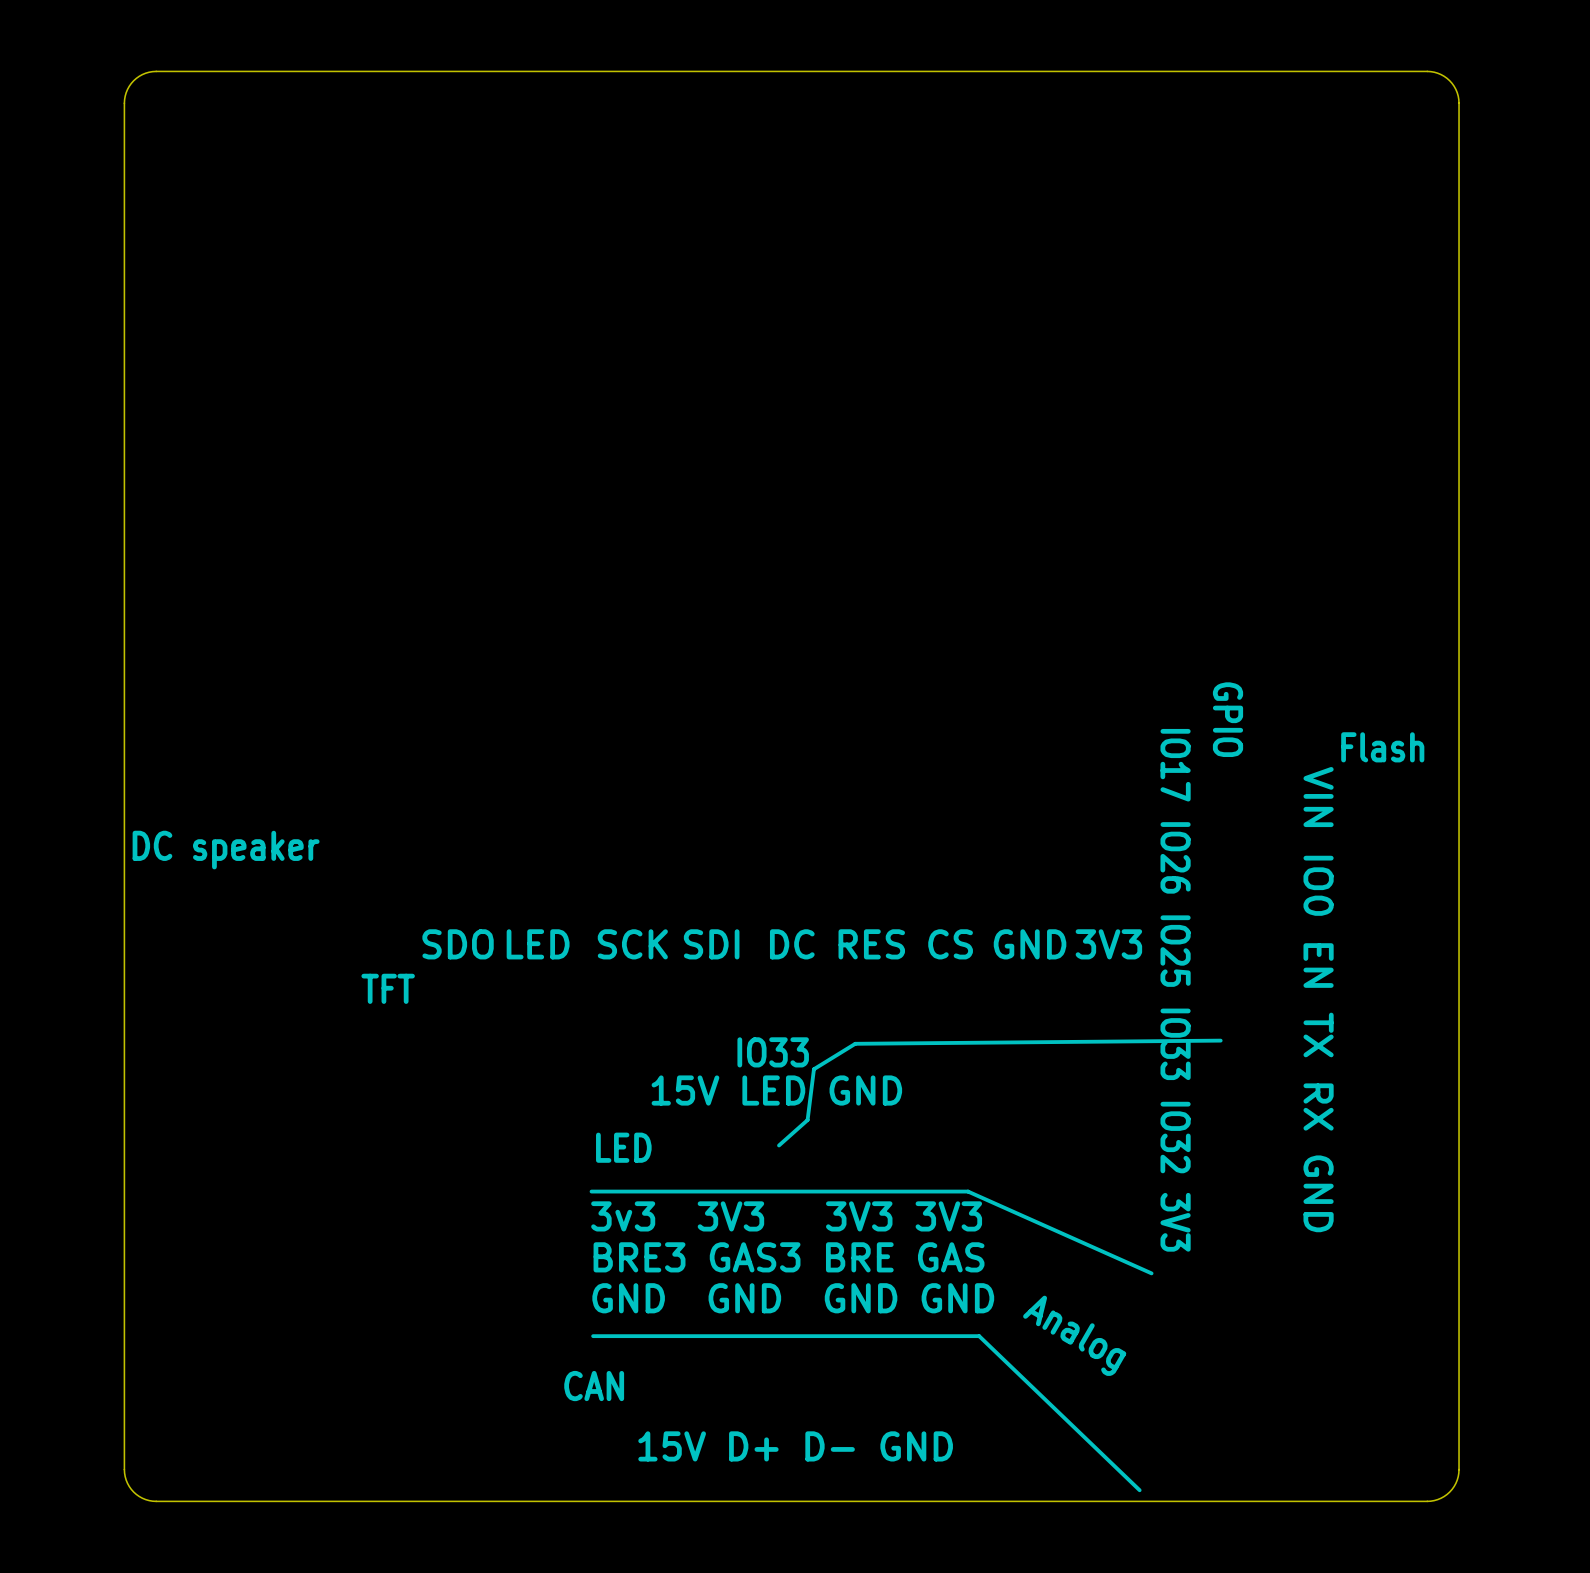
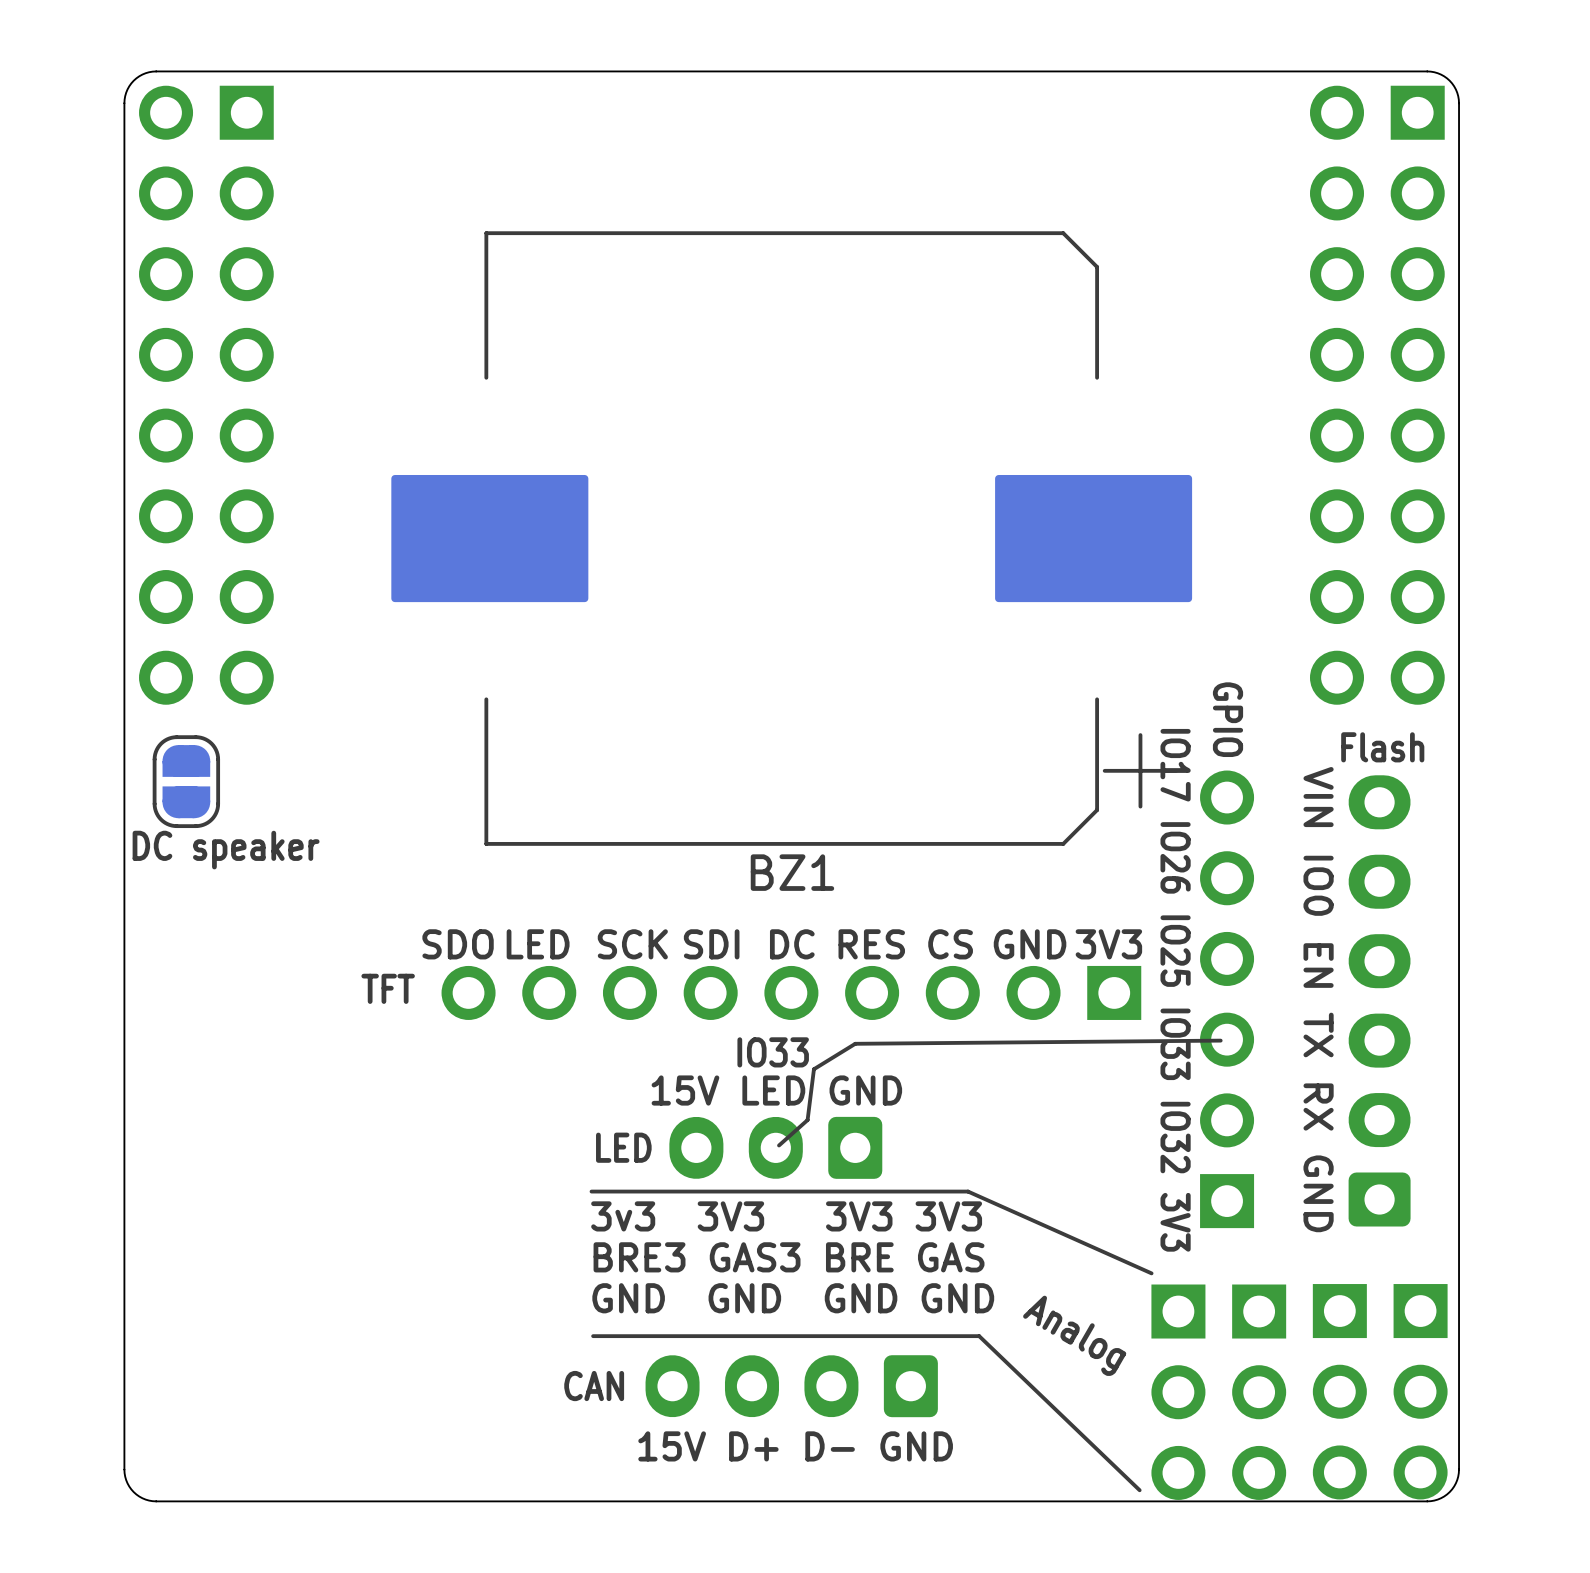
part: none -> (206, 395)
part: none -> (1377, 395)
BZ1: none -> (791, 538)
part: none -> (186, 781)
part: none -> (791, 992)
part: none -> (1227, 999)
part: none -> (1379, 1000)
part: none -> (775, 1147)
part: none -> (791, 1386)
part: none -> (1339, 1391)
part: none -> (1420, 1391)
part: none -> (1178, 1392)
part: none -> (1259, 1392)

